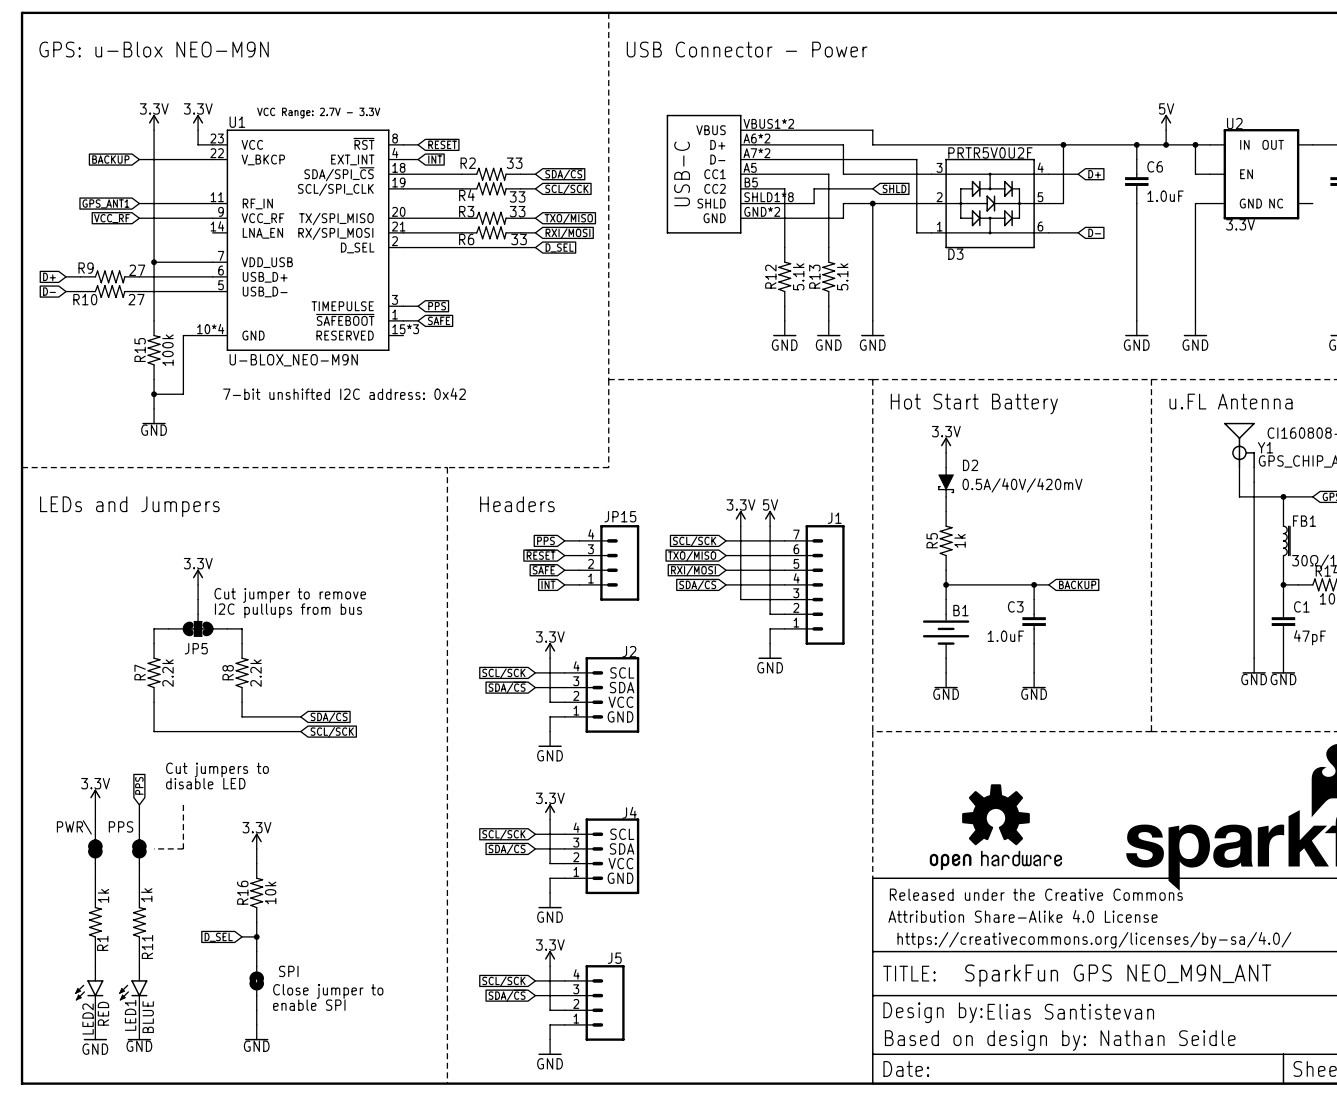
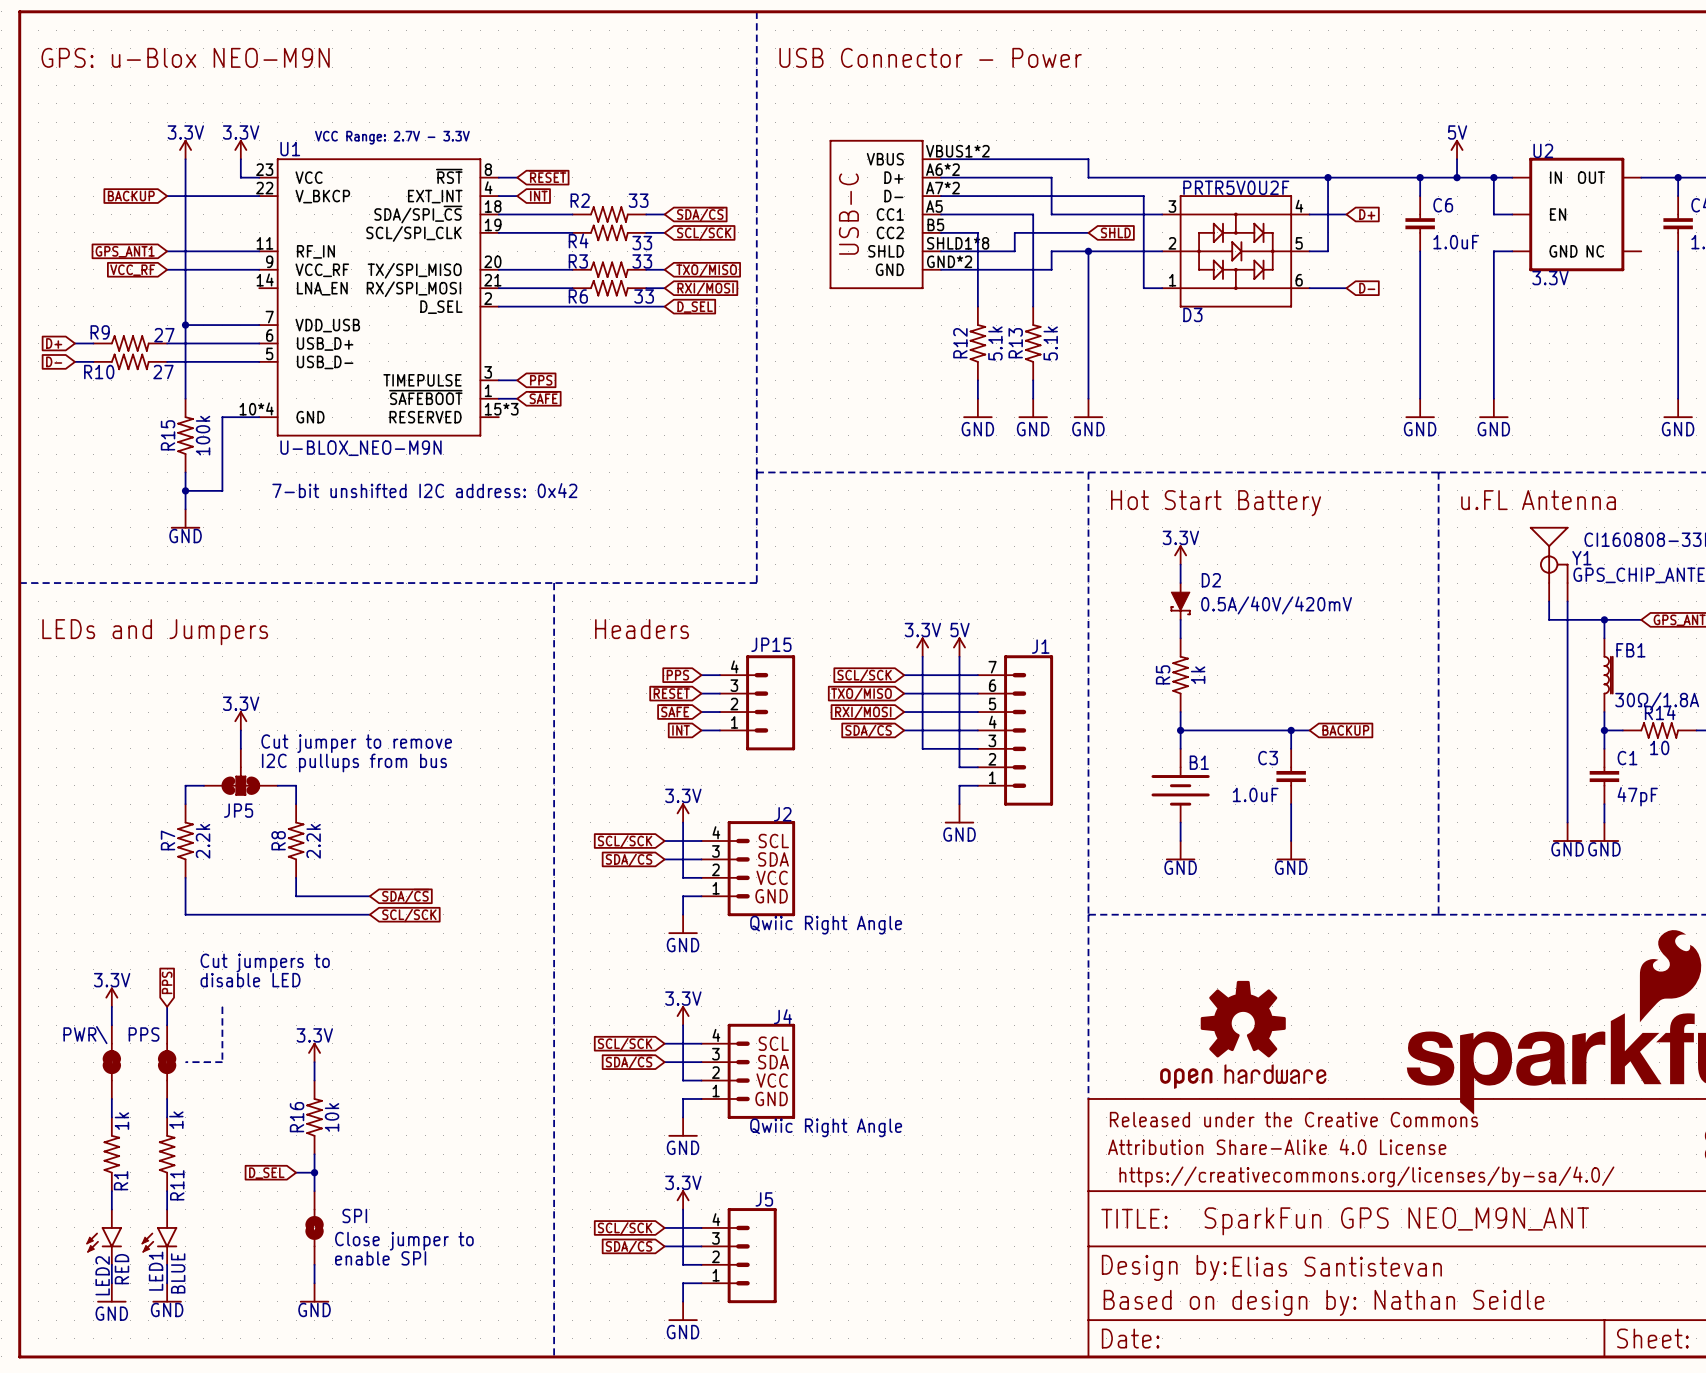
J2 value: none -> Qwiic Right Angle (826, 925)
J4 value: none -> Qwiic Right Angle (826, 1127)

